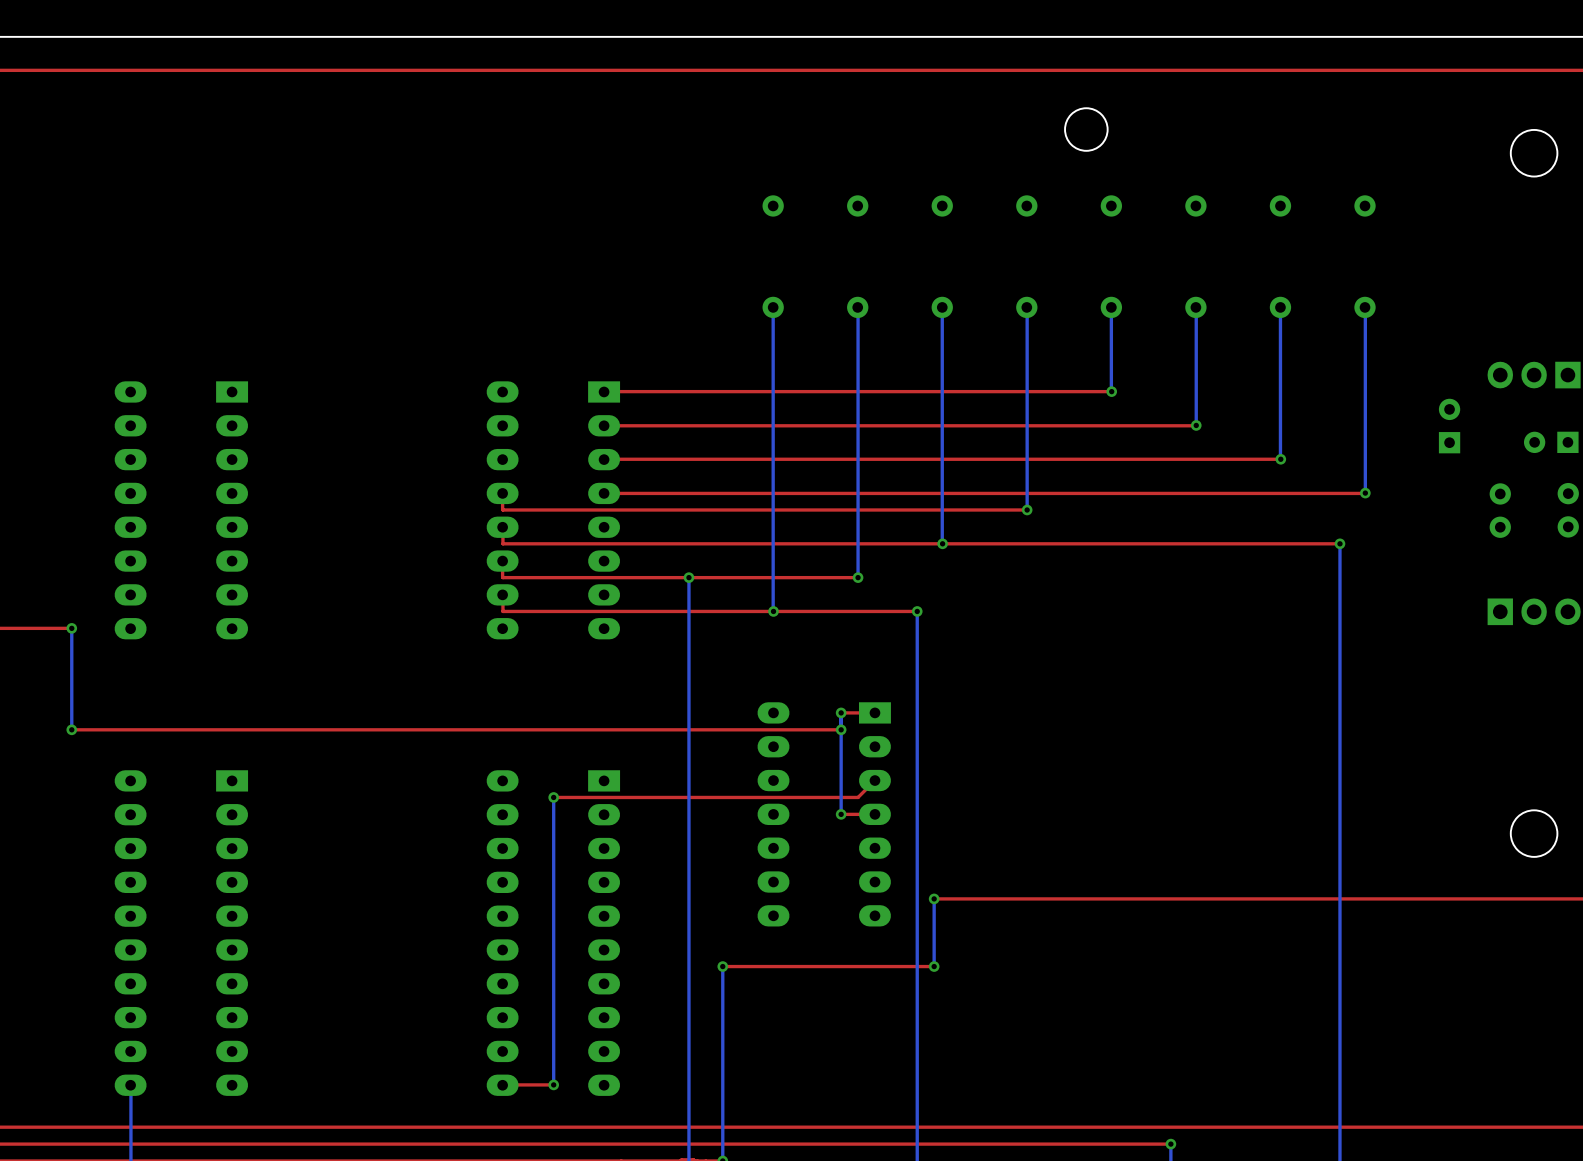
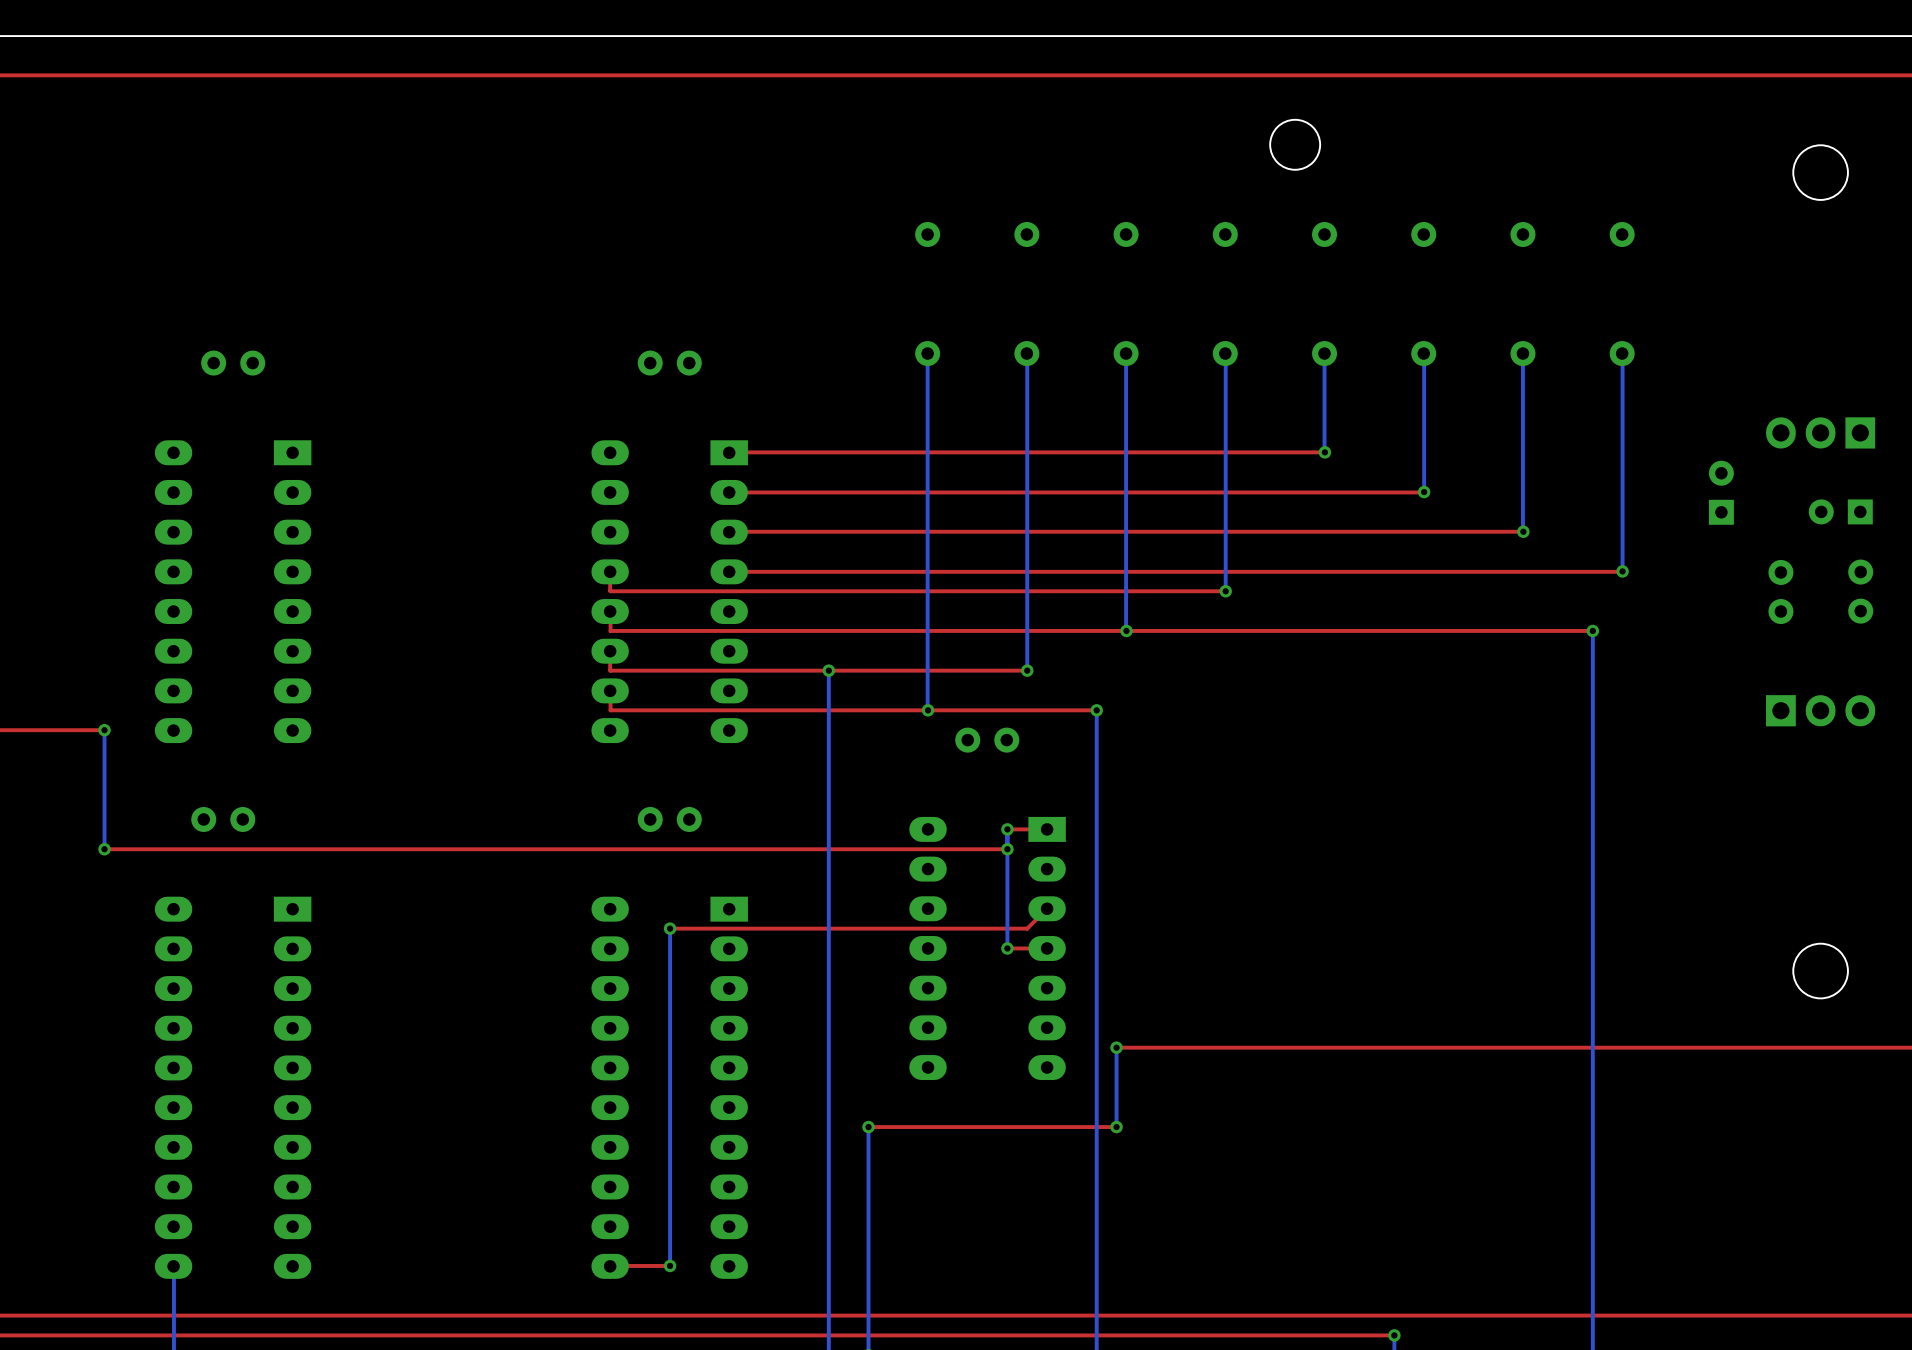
part: none -> (233, 363)
part: none -> (669, 363)
part: none -> (987, 740)
part: none -> (223, 819)
part: none -> (669, 819)

